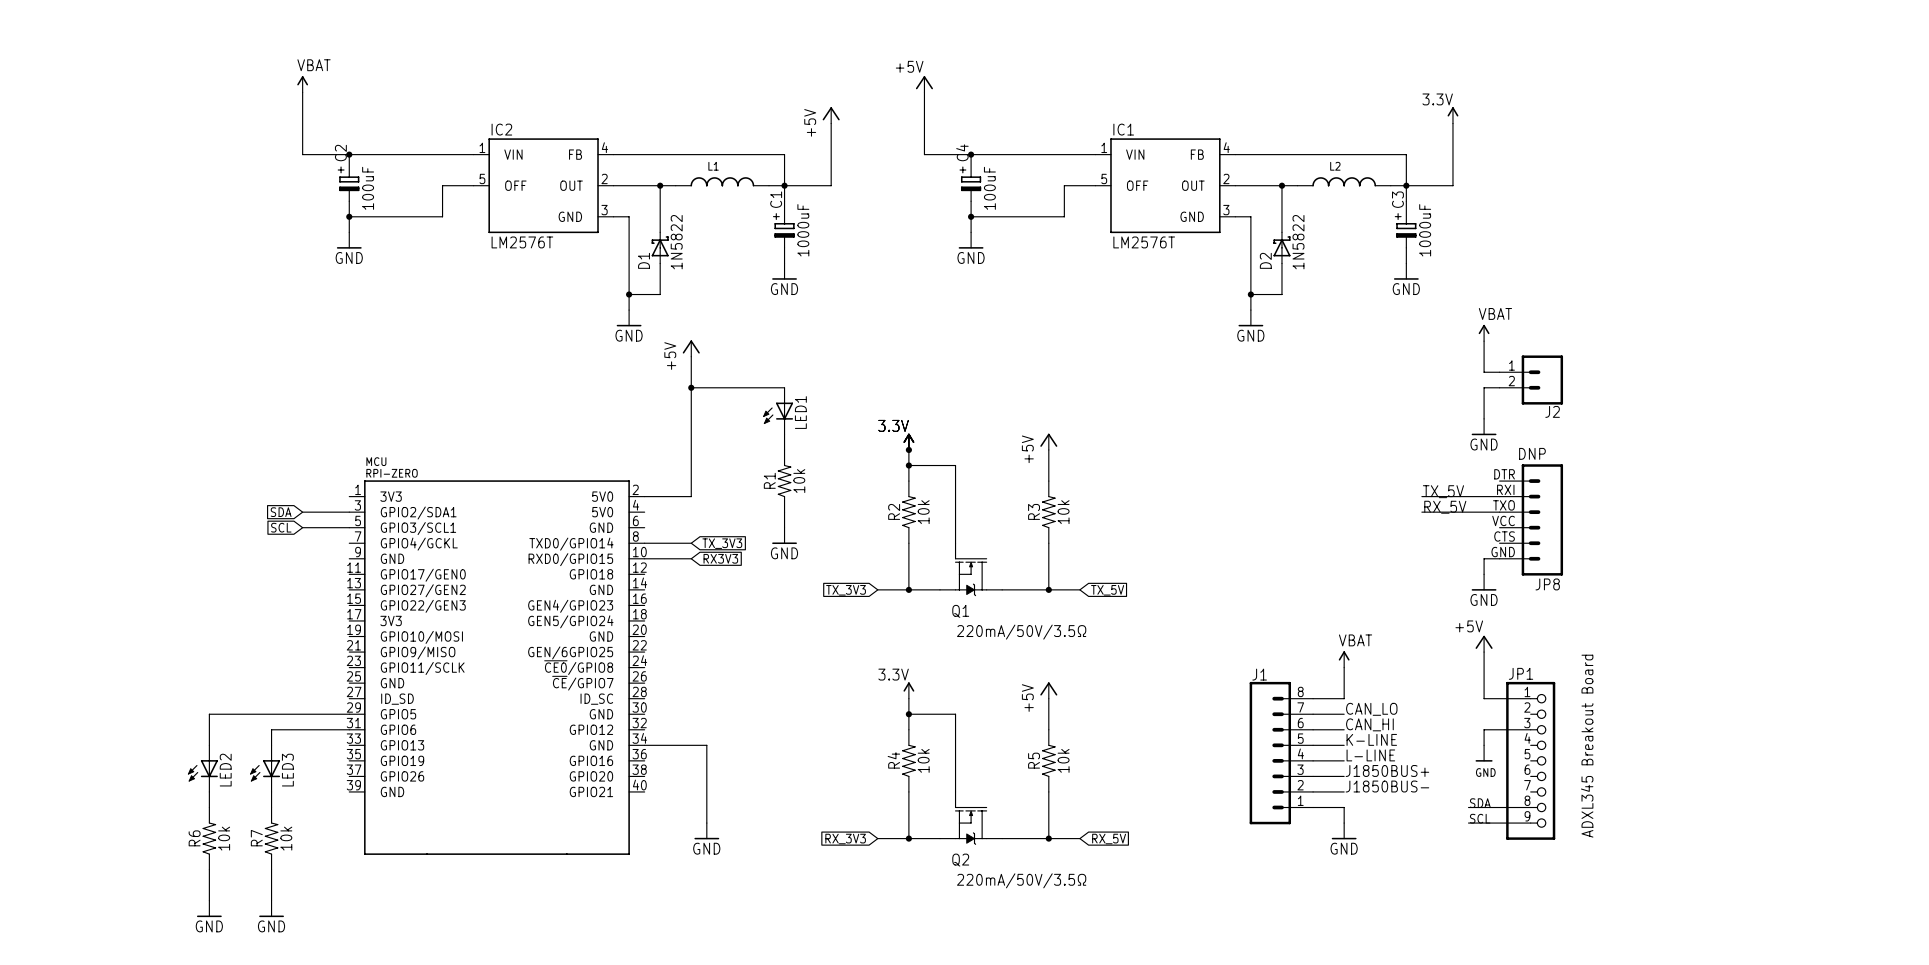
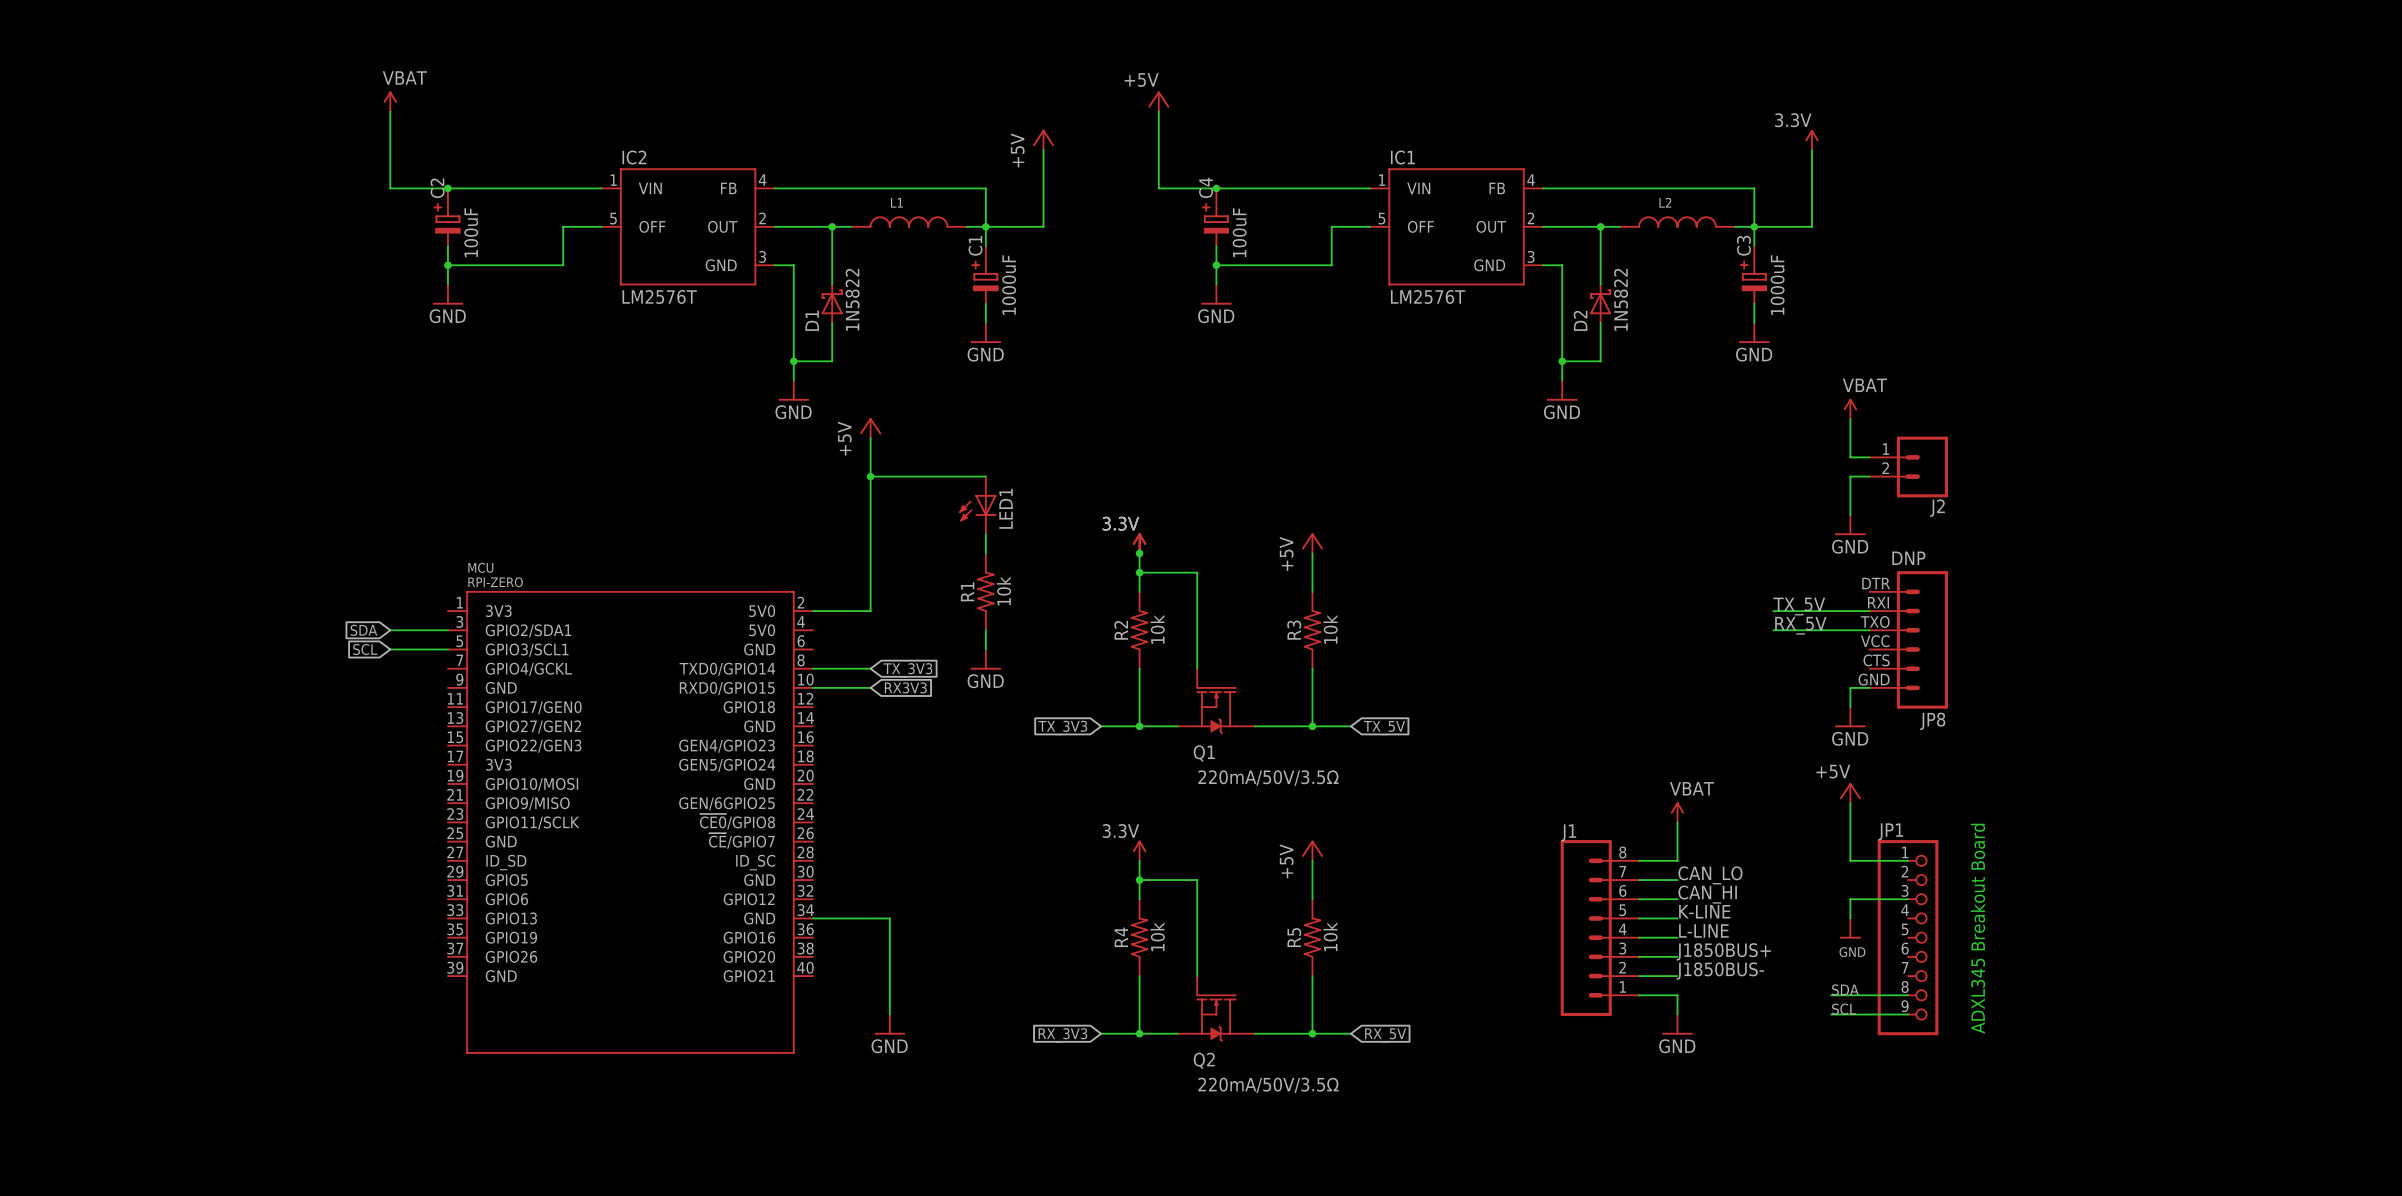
wire: (349, 714) (209, 714) (209, 745) -> none
wire: (349, 729) (271, 729) (271, 745) -> none
LED2: (202, 768) -> none
LED3: (265, 768) -> none
wire: (209, 791) (209, 807) -> none
wire: (271, 791) (271, 807) -> none
R6: 10k (209, 838) -> none
R7: 10k (271, 838) -> none
wire: (209, 869) (209, 900) -> none
wire: (271, 869) (271, 900) -> none
power symbol: GND (209, 908) -> none
power symbol: GND (271, 908) -> none

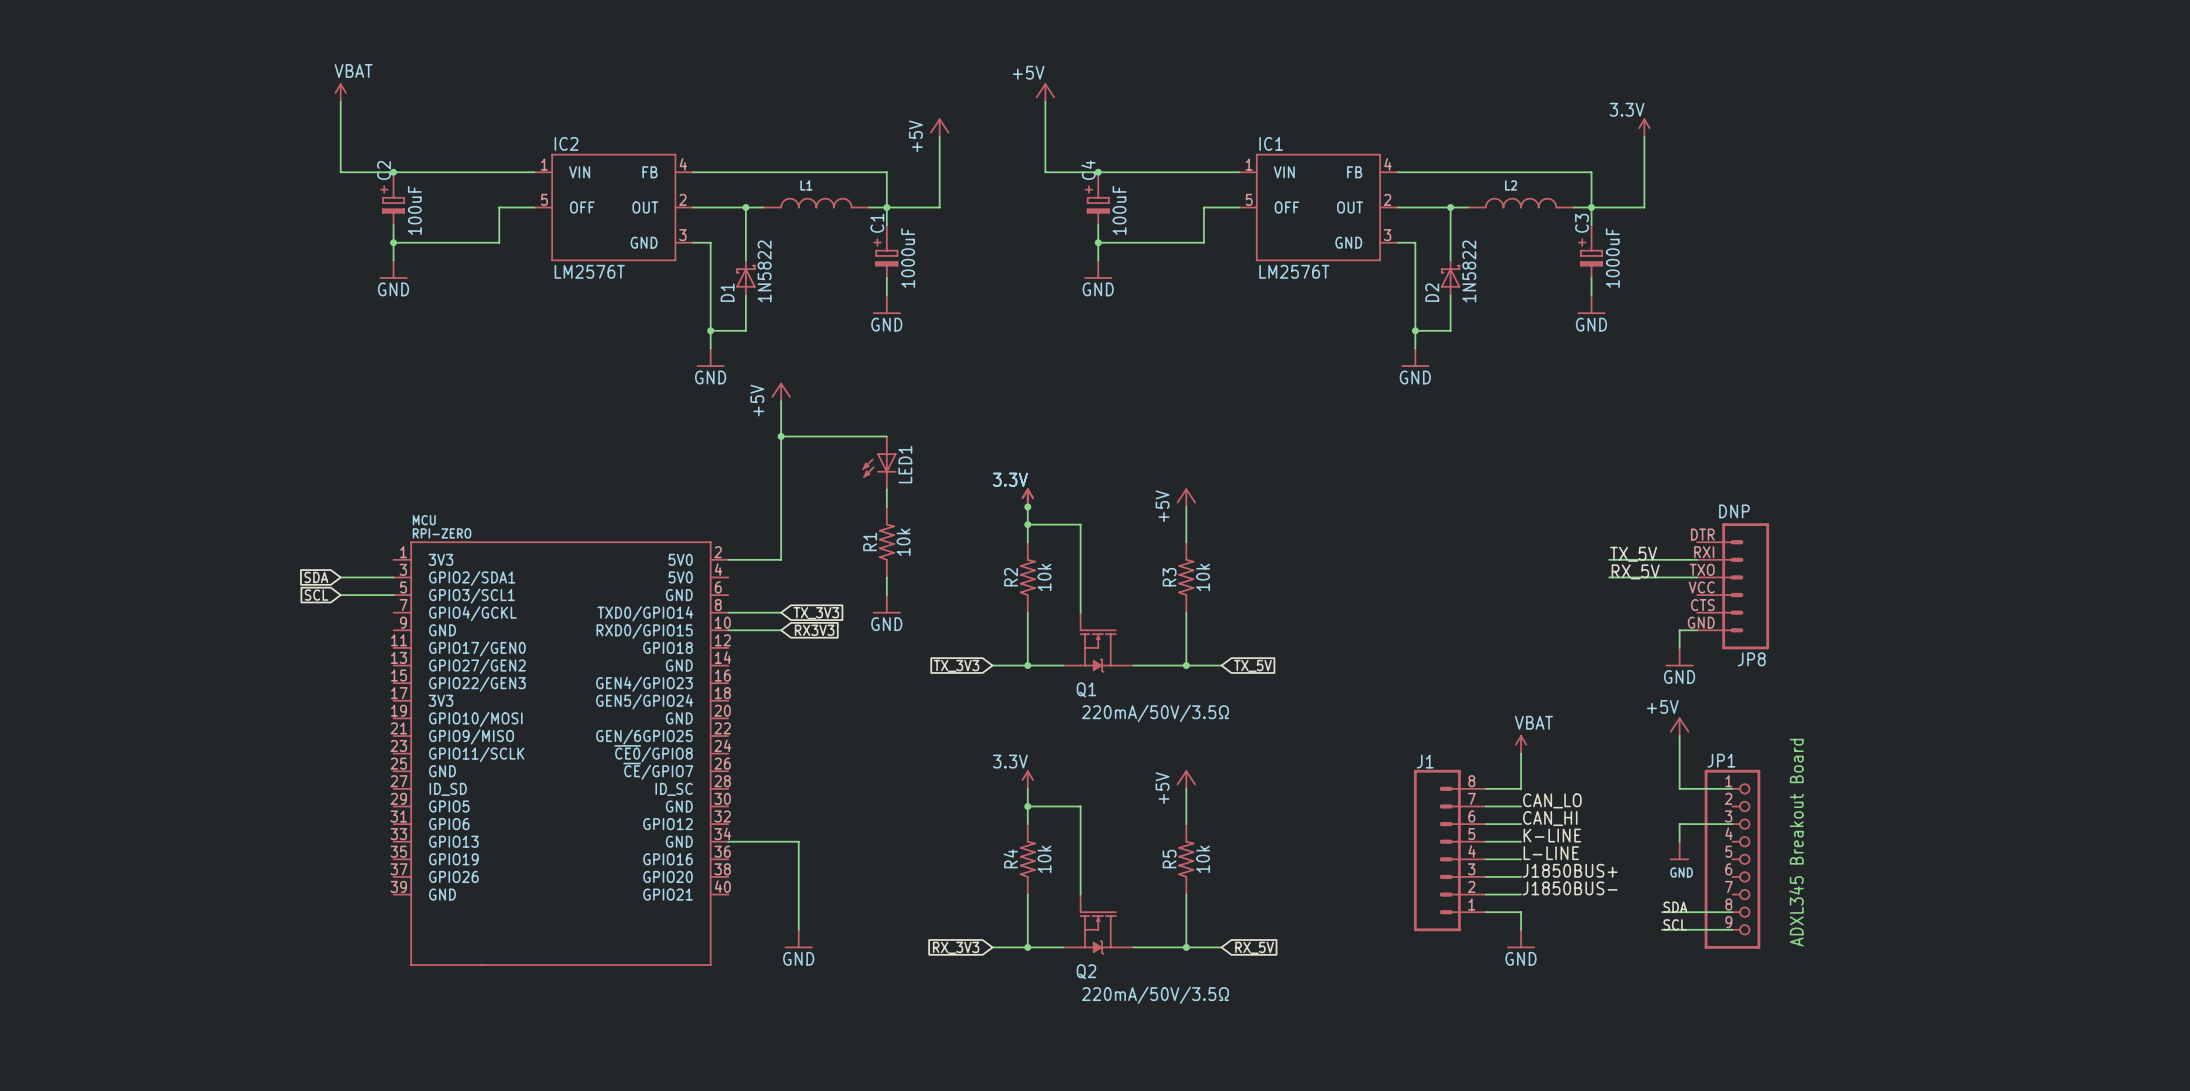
power symbol: VBAT (1850, 408) -> none
wire: (1850, 418) (1850, 457) (1869, 457) -> none
J2: (1908, 466) -> none
wire: (1869, 476) (1850, 476) (1850, 515) -> none
power symbol: GND (1850, 525) -> none

